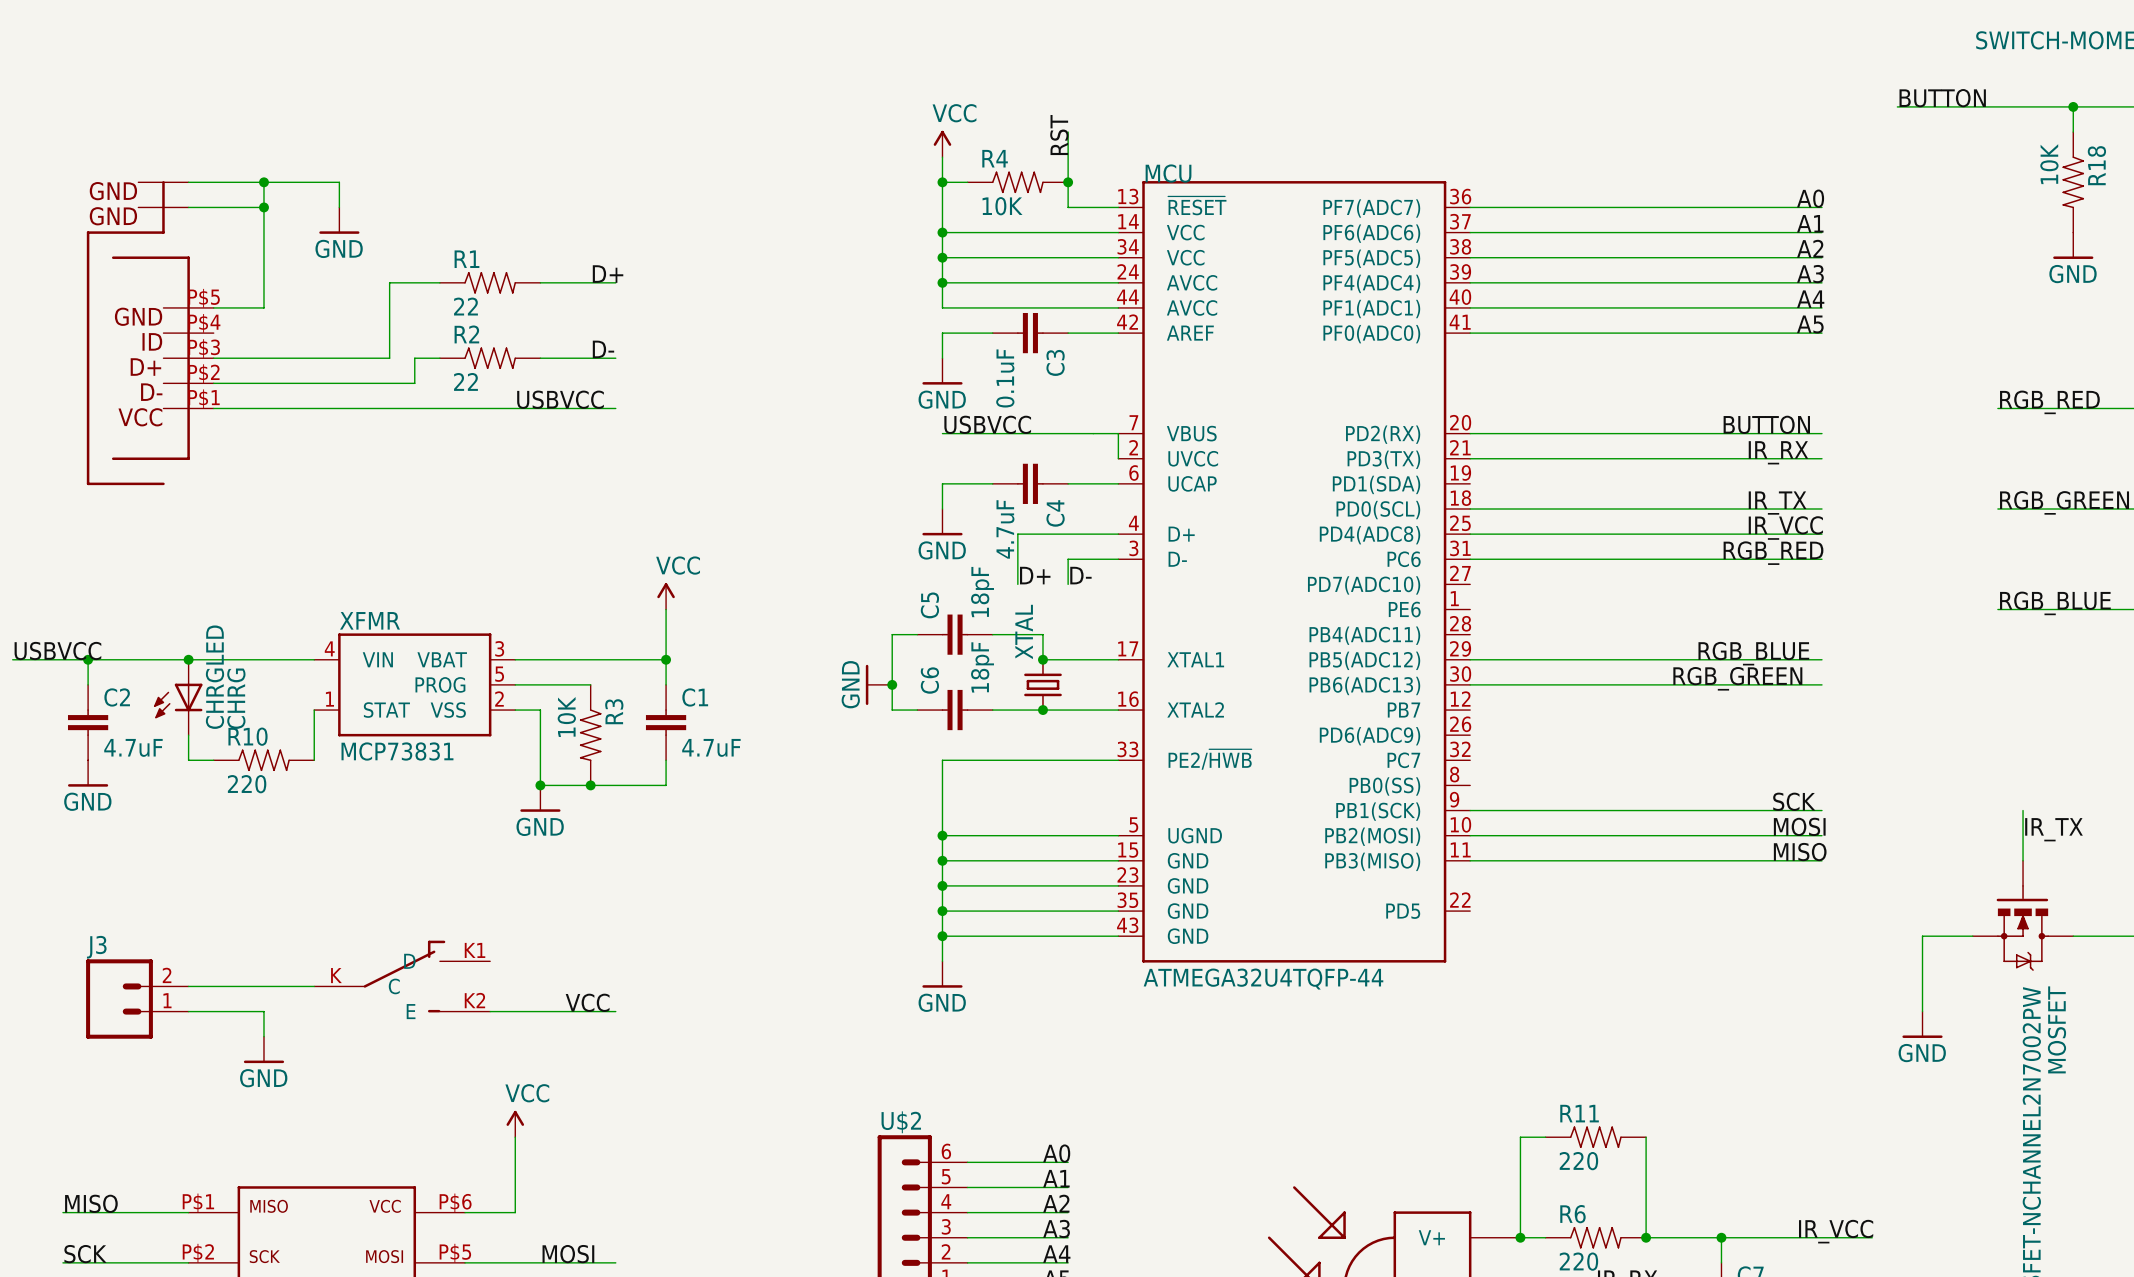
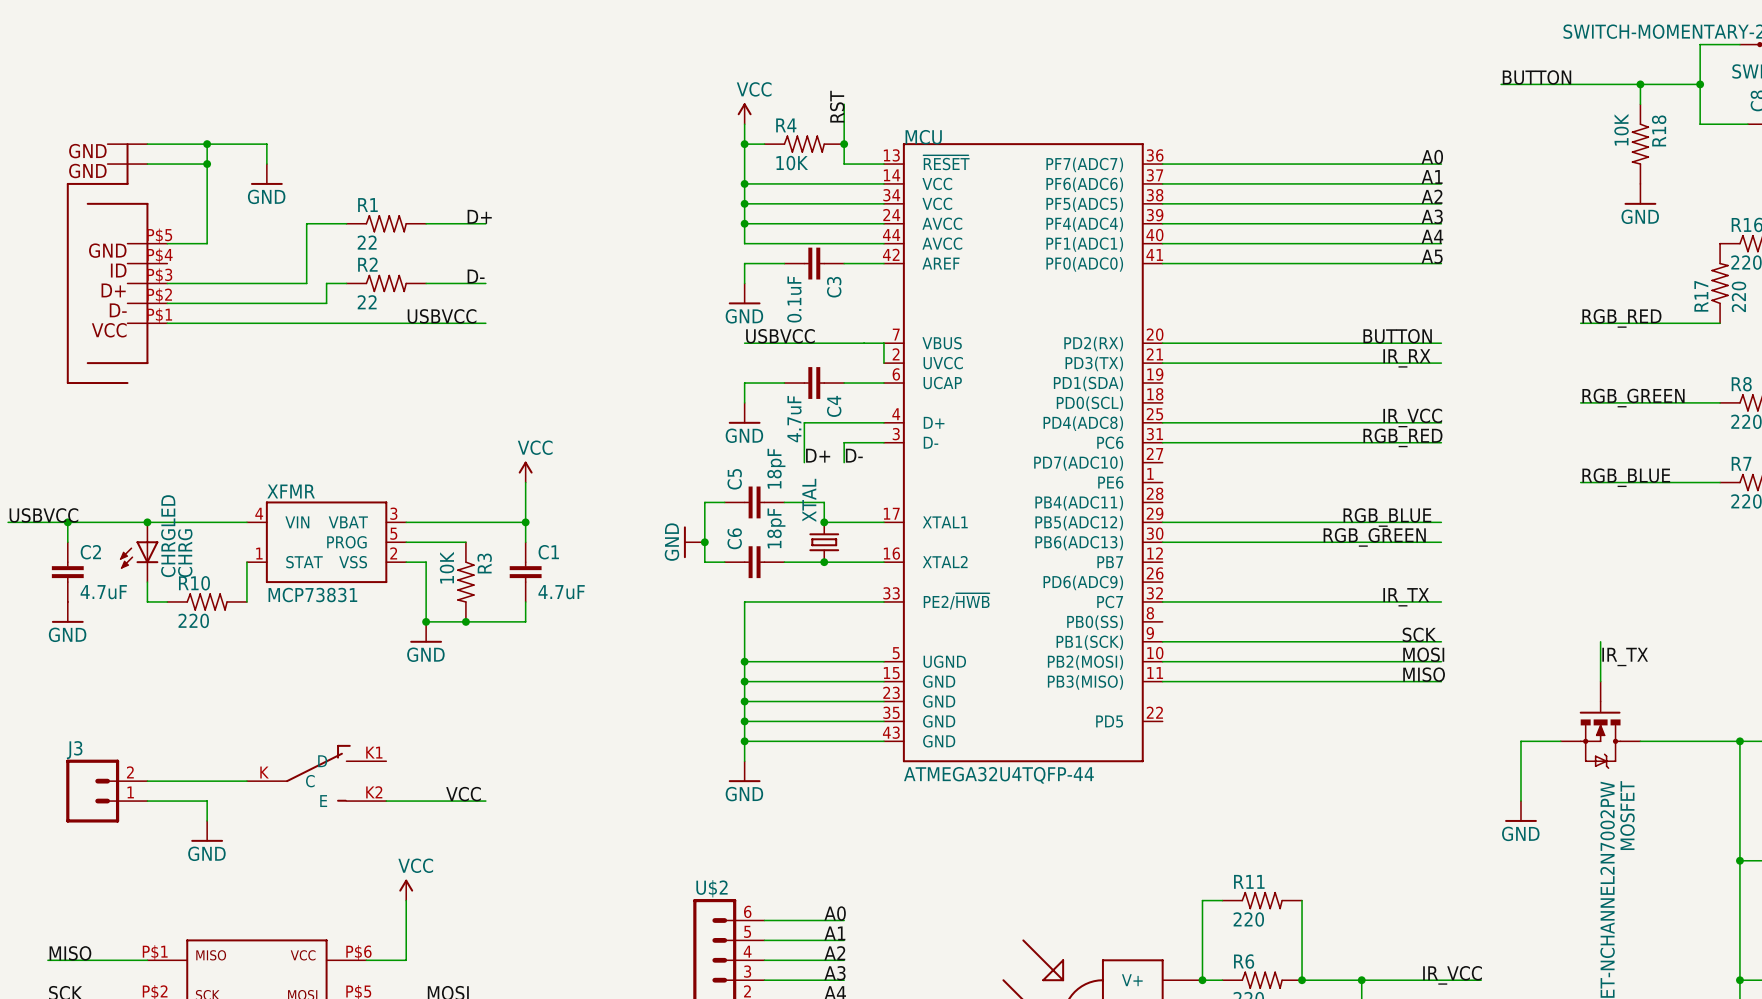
label: IR_TX (1777, 503) -> none
wire: (1470, 509) (1821, 509) -> none
label: none -> IR_TX (1406, 597)
wire: none -> (1162, 601) (1441, 601)

